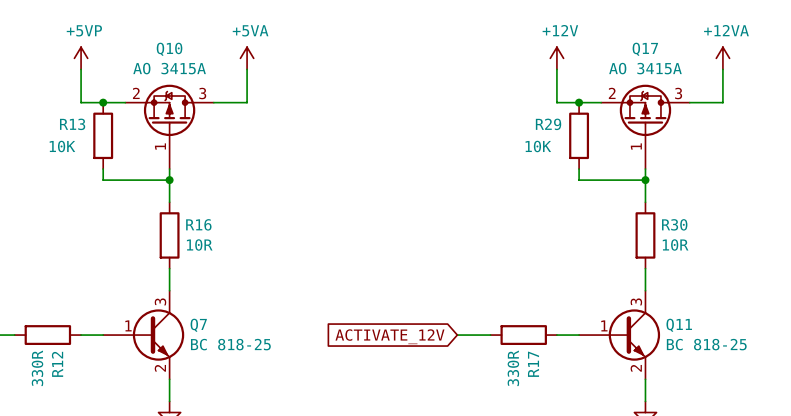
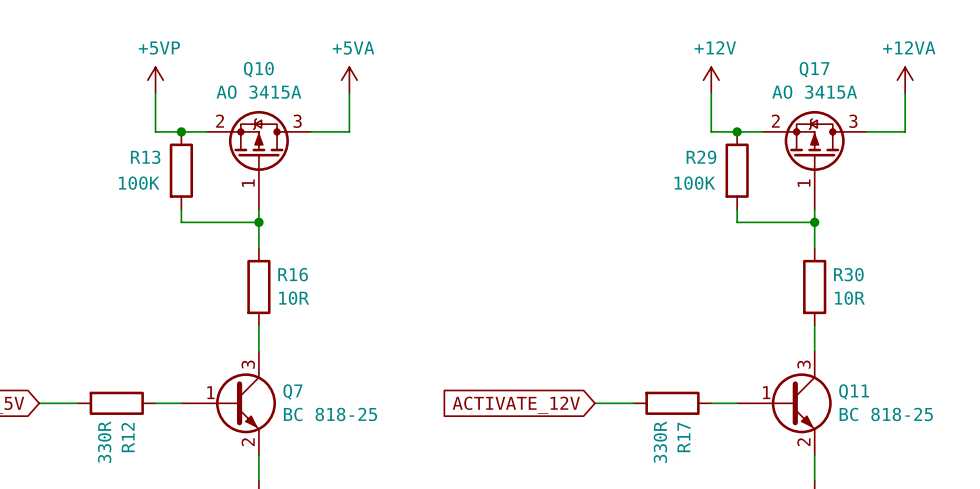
R13 value: 10K (62, 146) -> 100K (139, 183)
R29 value: 10K (538, 146) -> 100K (694, 183)

